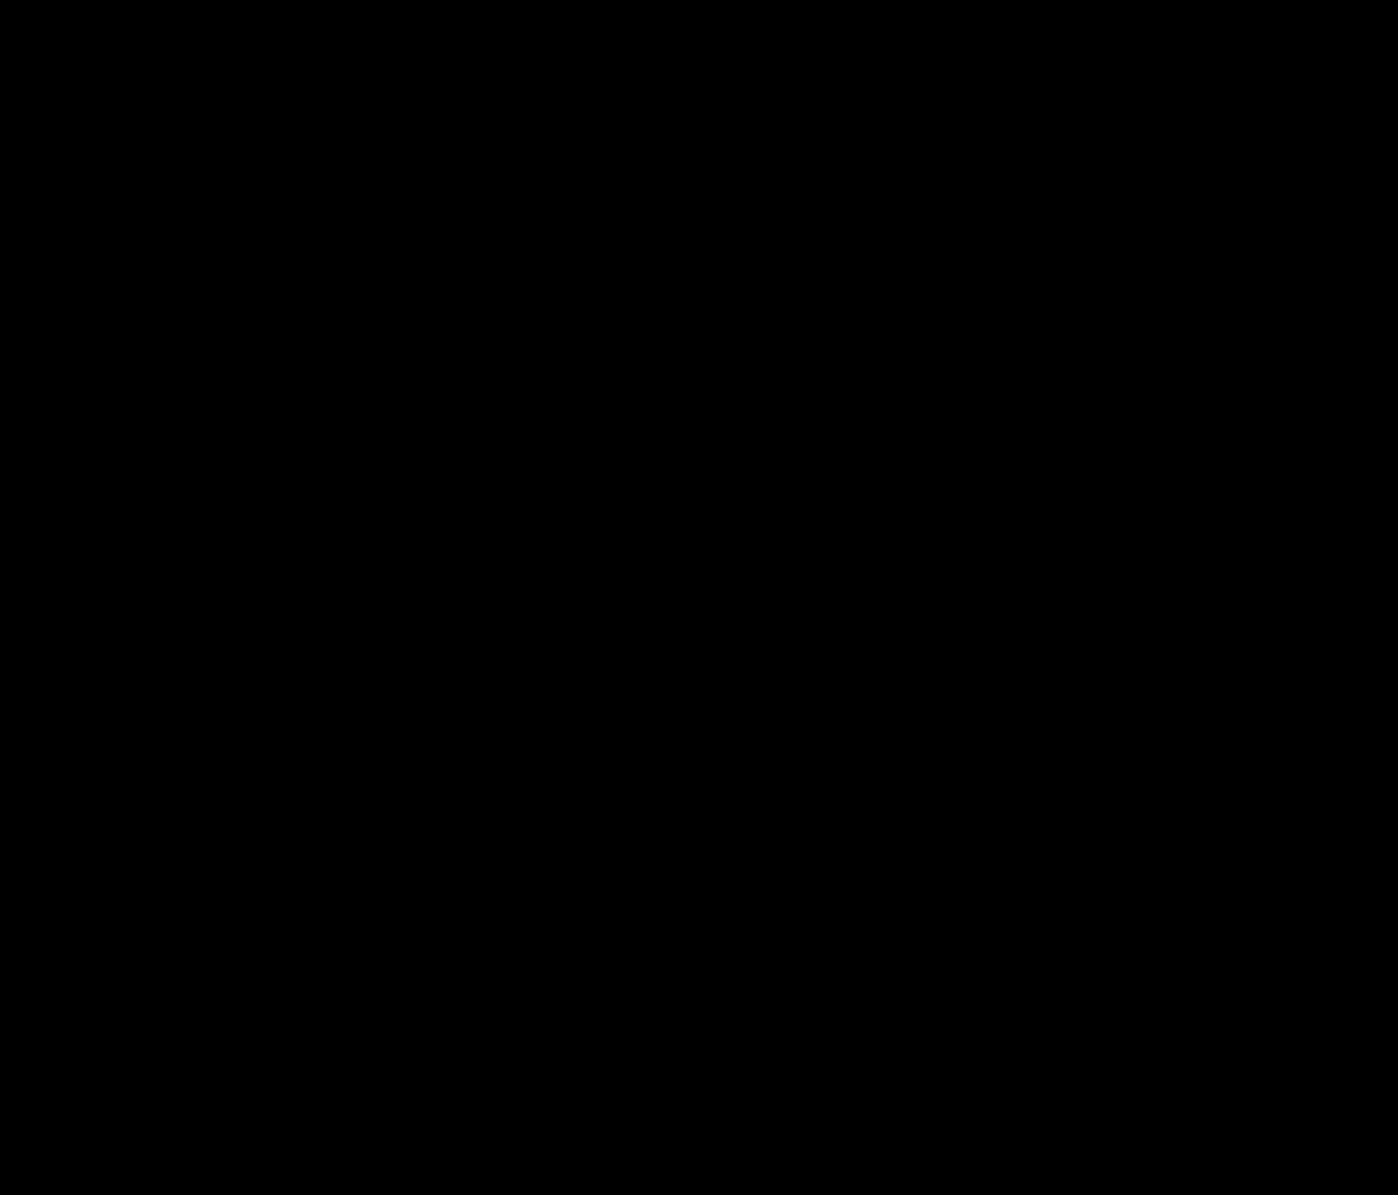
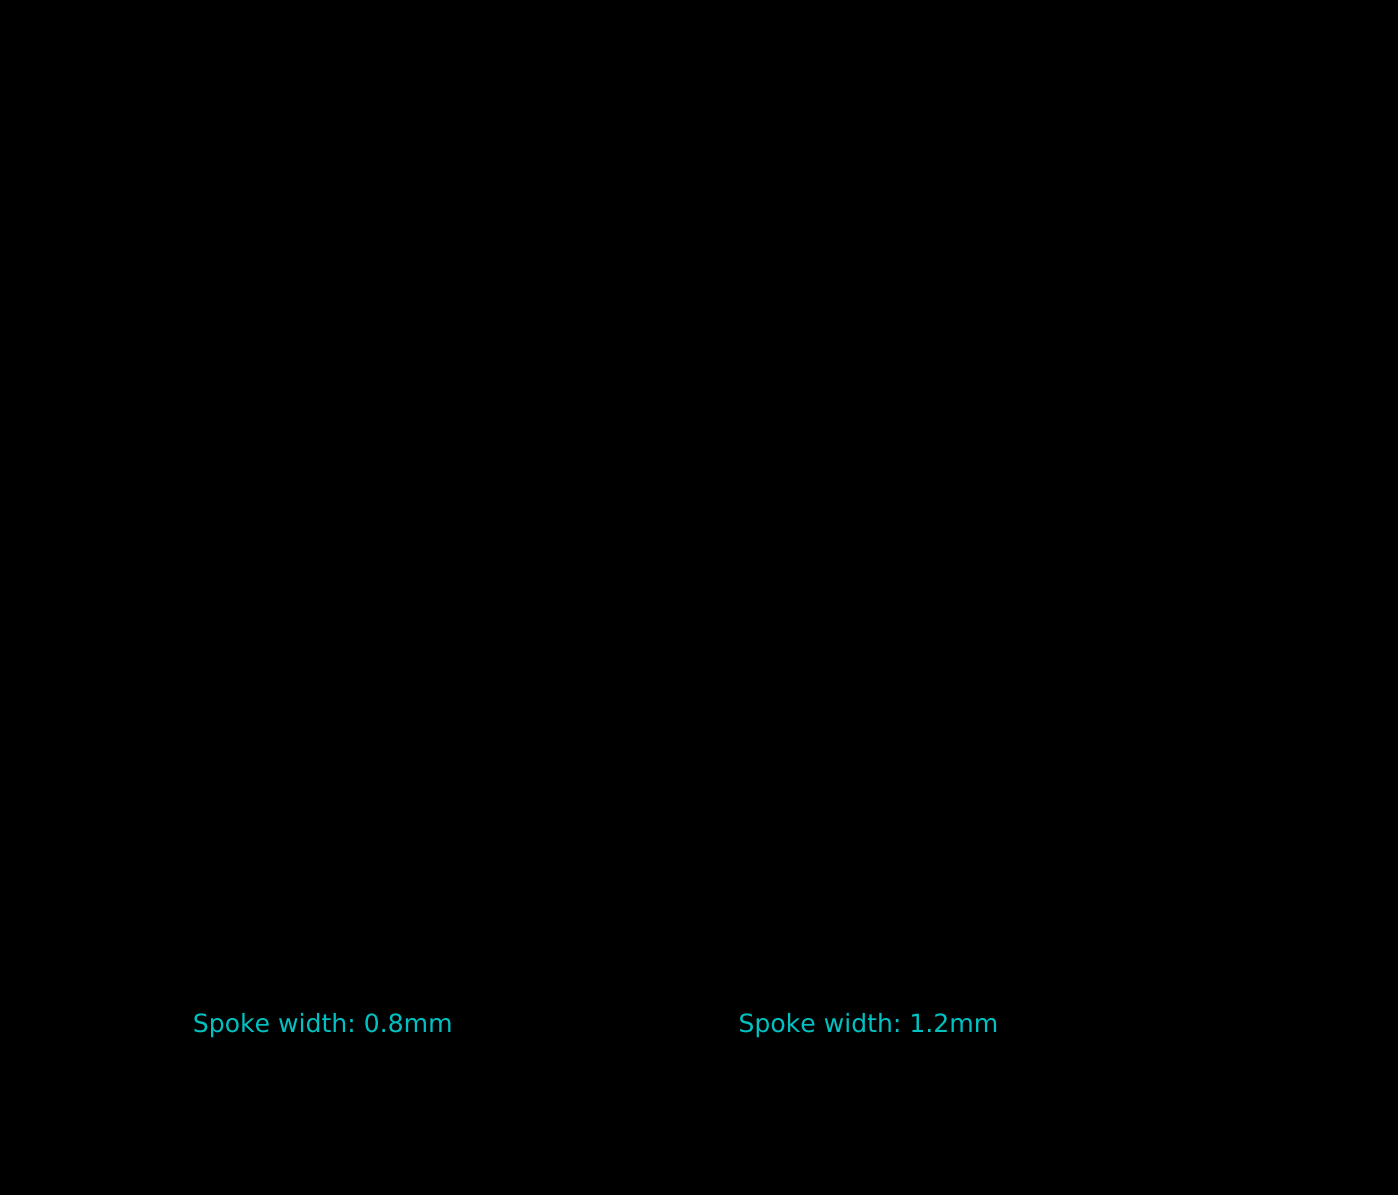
text: none -> Spoke width: 0.8mm (322, 1025)
text: none -> Spoke width: 1.2mm (868, 1025)

